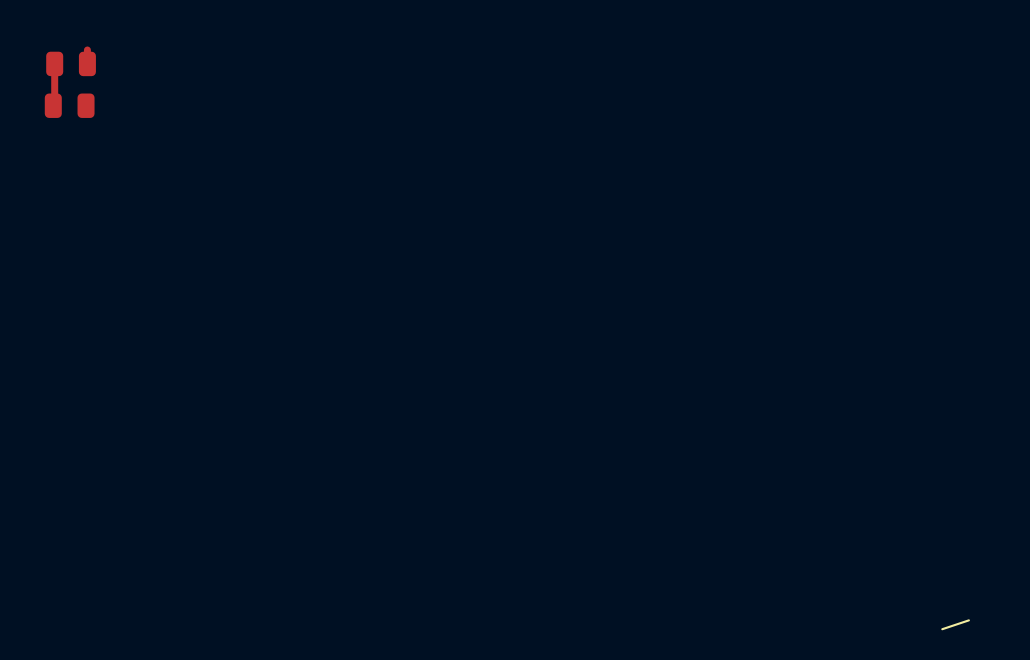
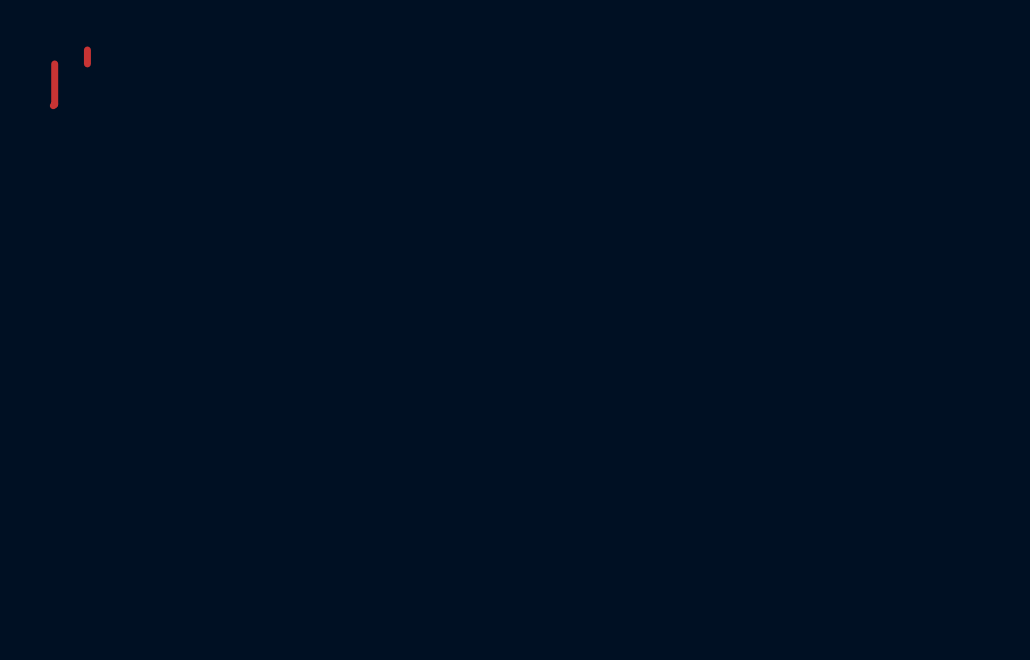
part: (71, 63) -> none
part: (69, 105) -> none
line: (968, 620) (942, 629) -> none

